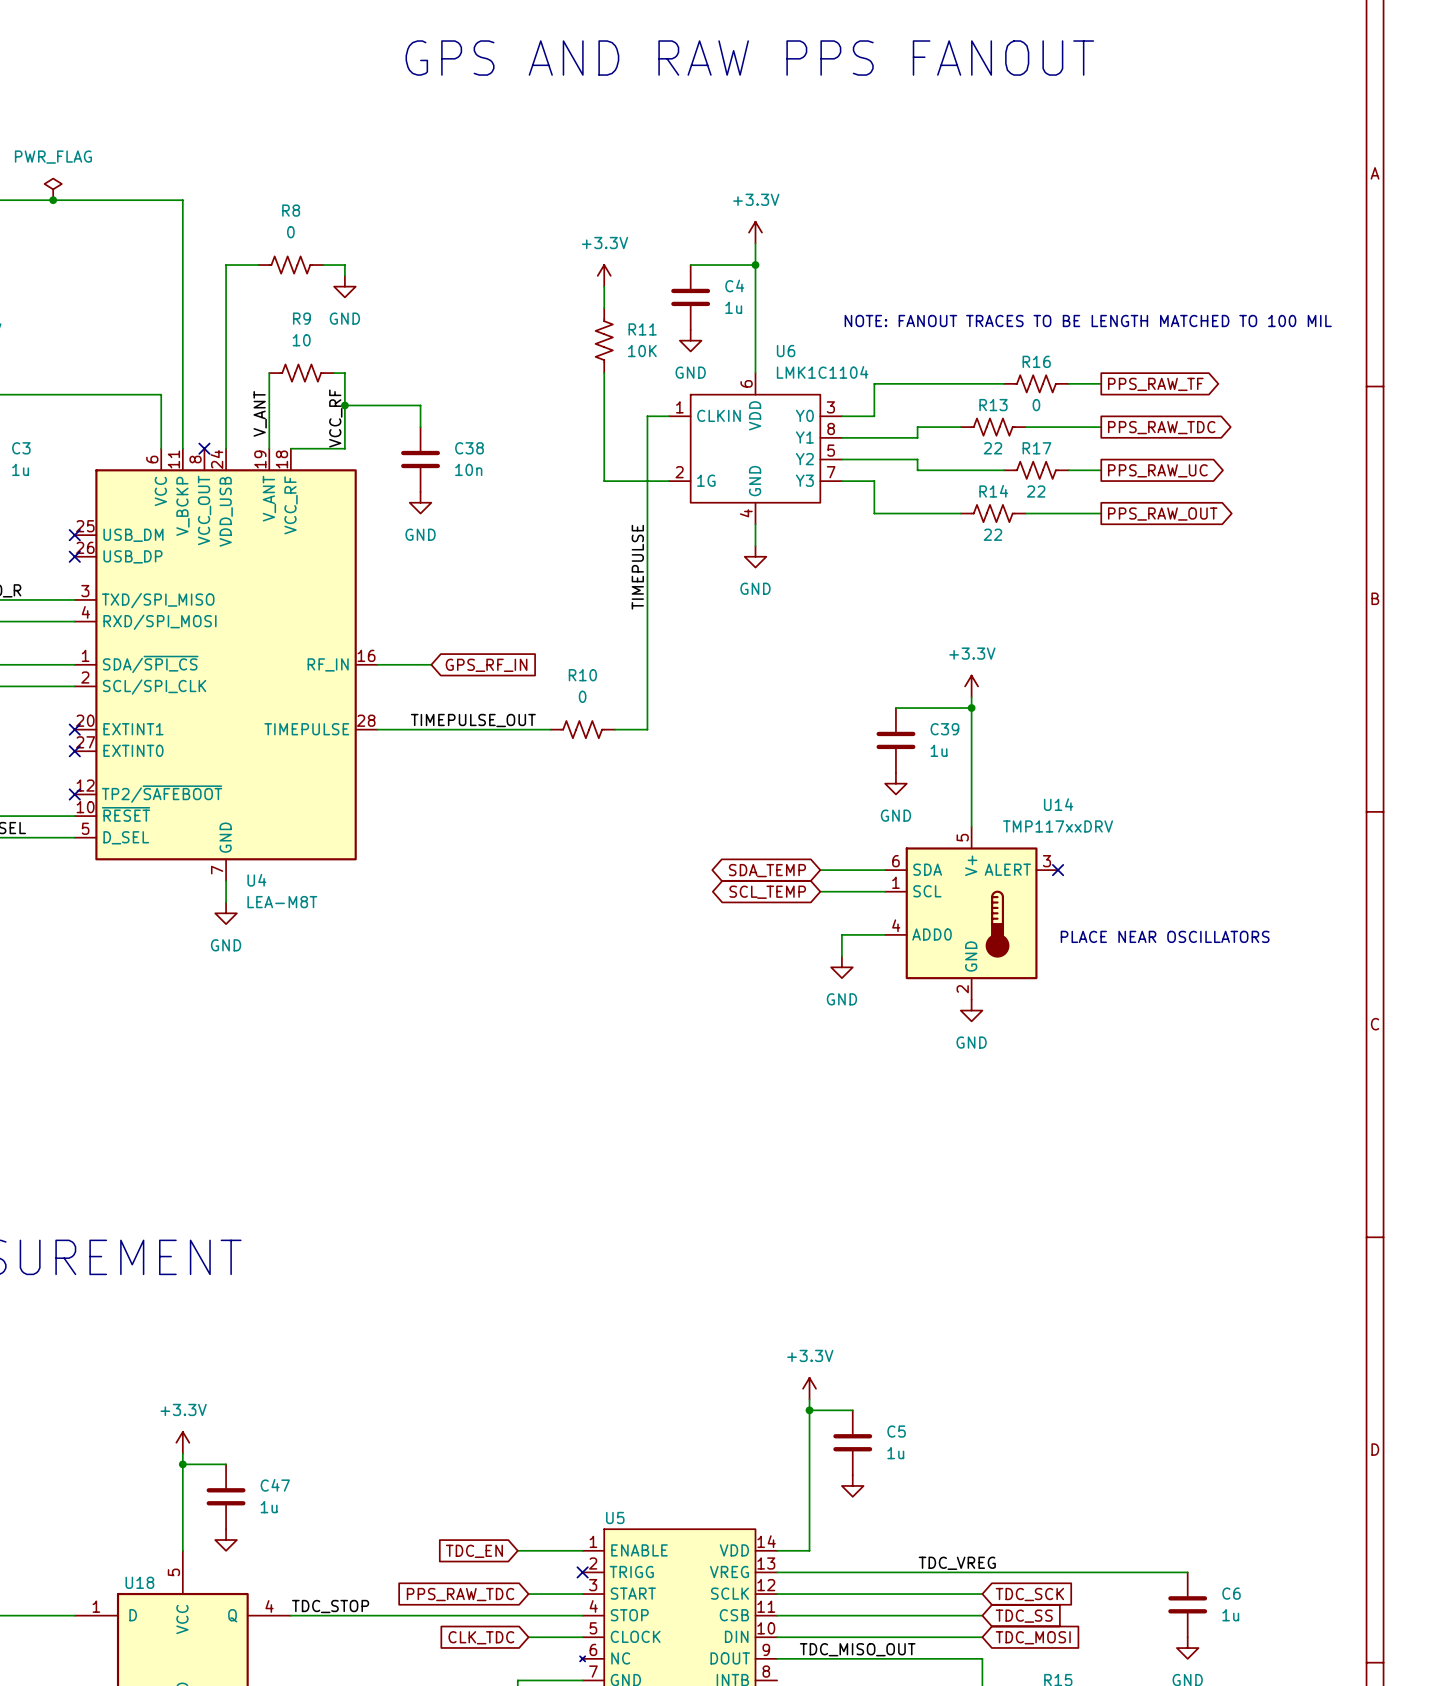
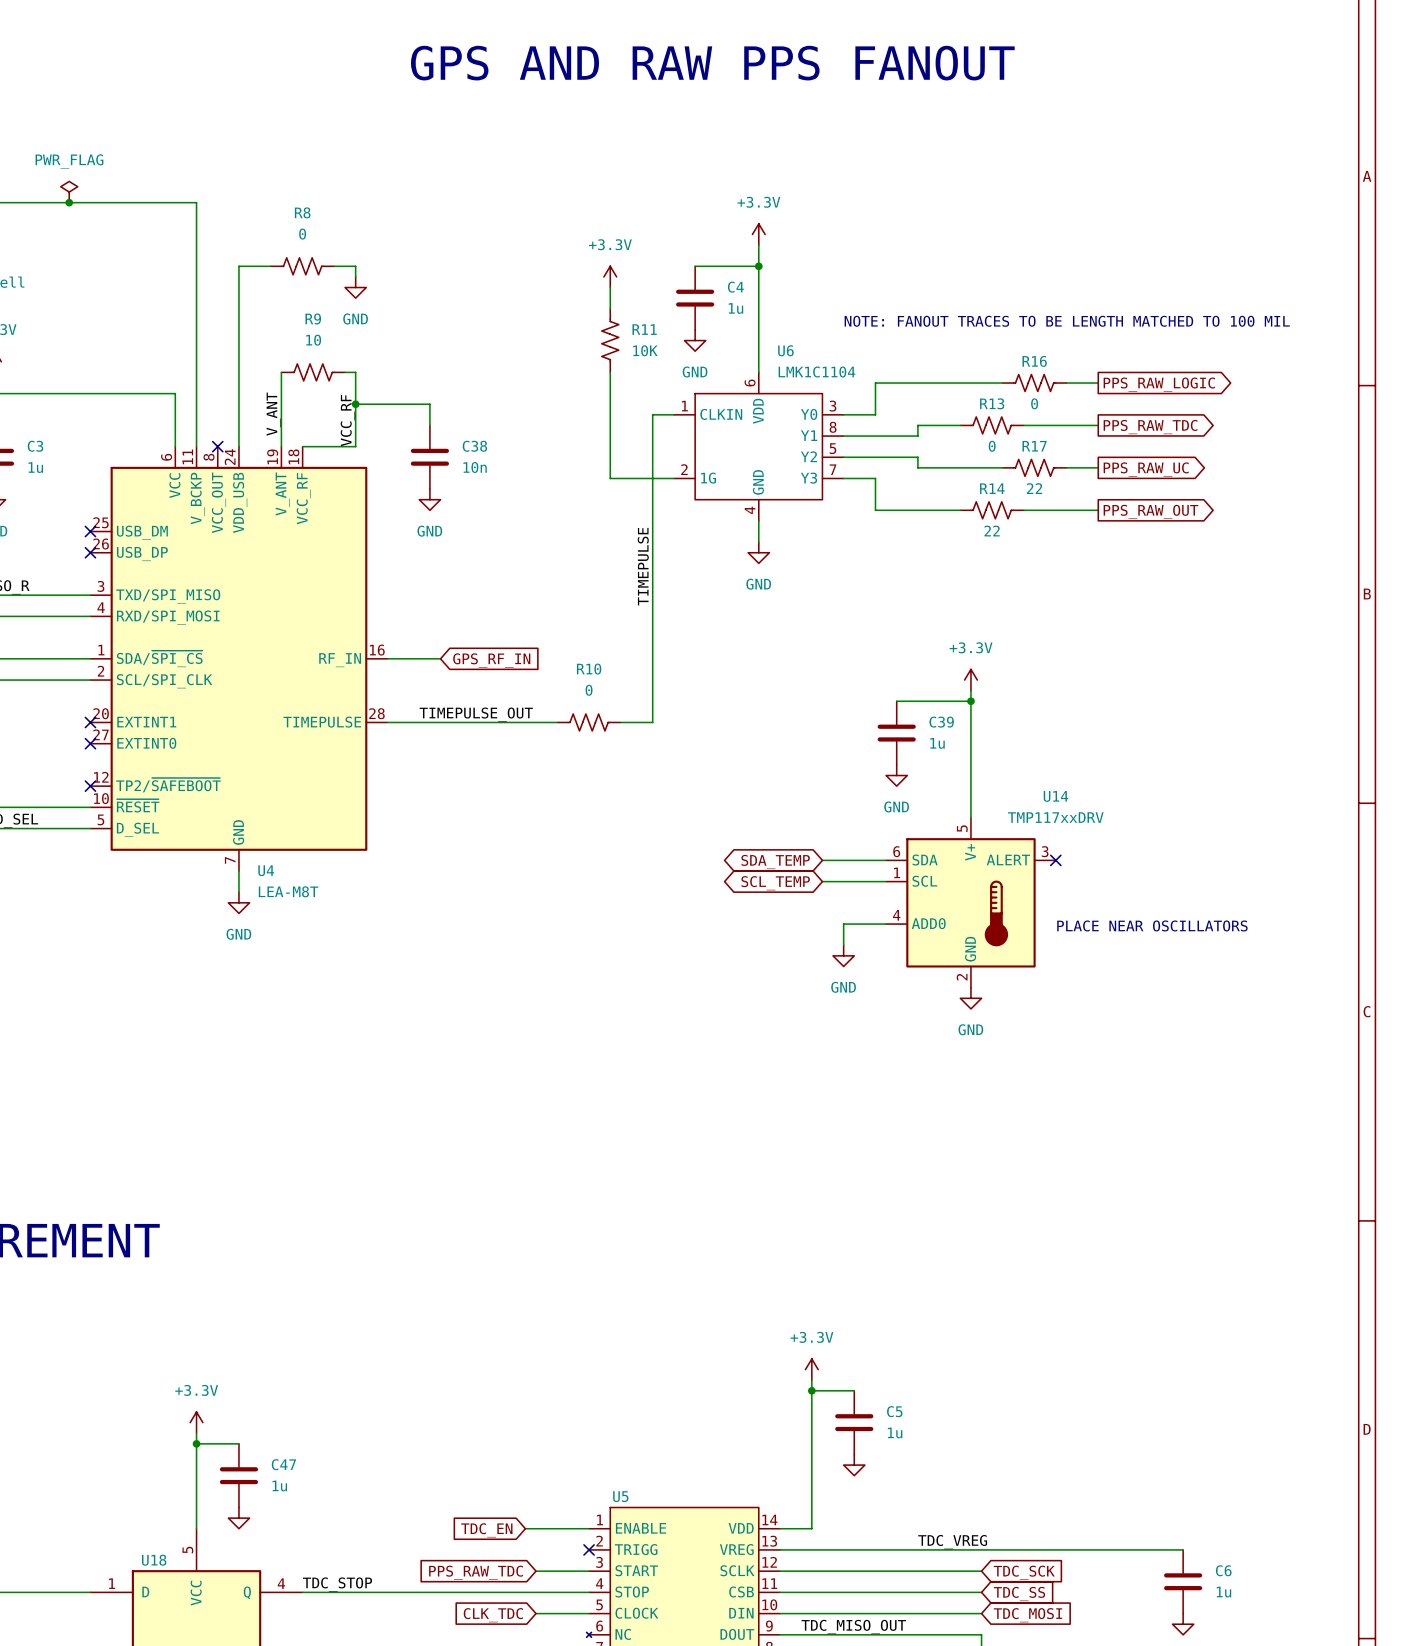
global label: PPS_RAW_TF (1155, 384) -> PPS_RAW_LOGIC (1159, 384)
R13 value: 22 (992, 448) -> 0 (992, 446)

